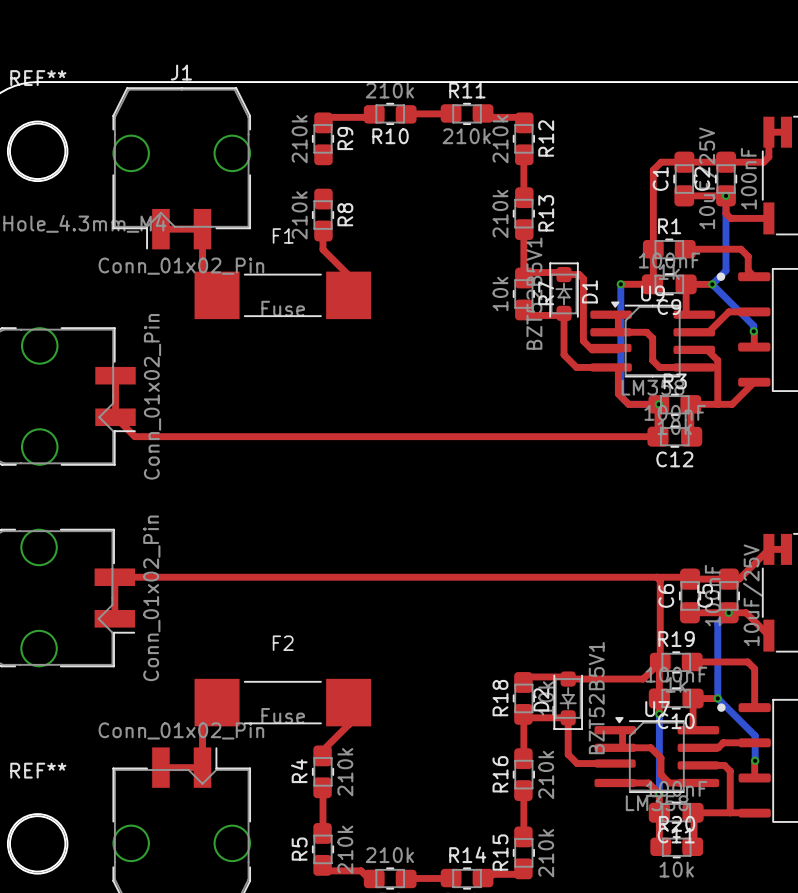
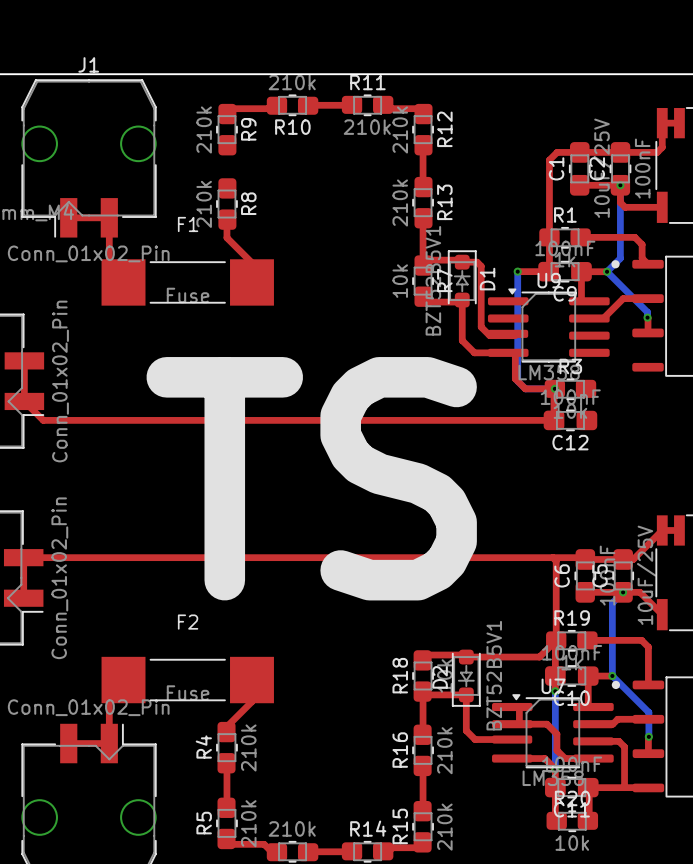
top track: (618, 314) (618, 332) (646, 332) (652, 338) (652, 360) (659, 367) (686, 367) -> none
top track: (686, 349) (707, 349) (717, 360) (717, 404) -> none
top track: (754, 382) (732, 404) (690, 404) (691, 436) -> none
text: none -> TS (311, 478)

